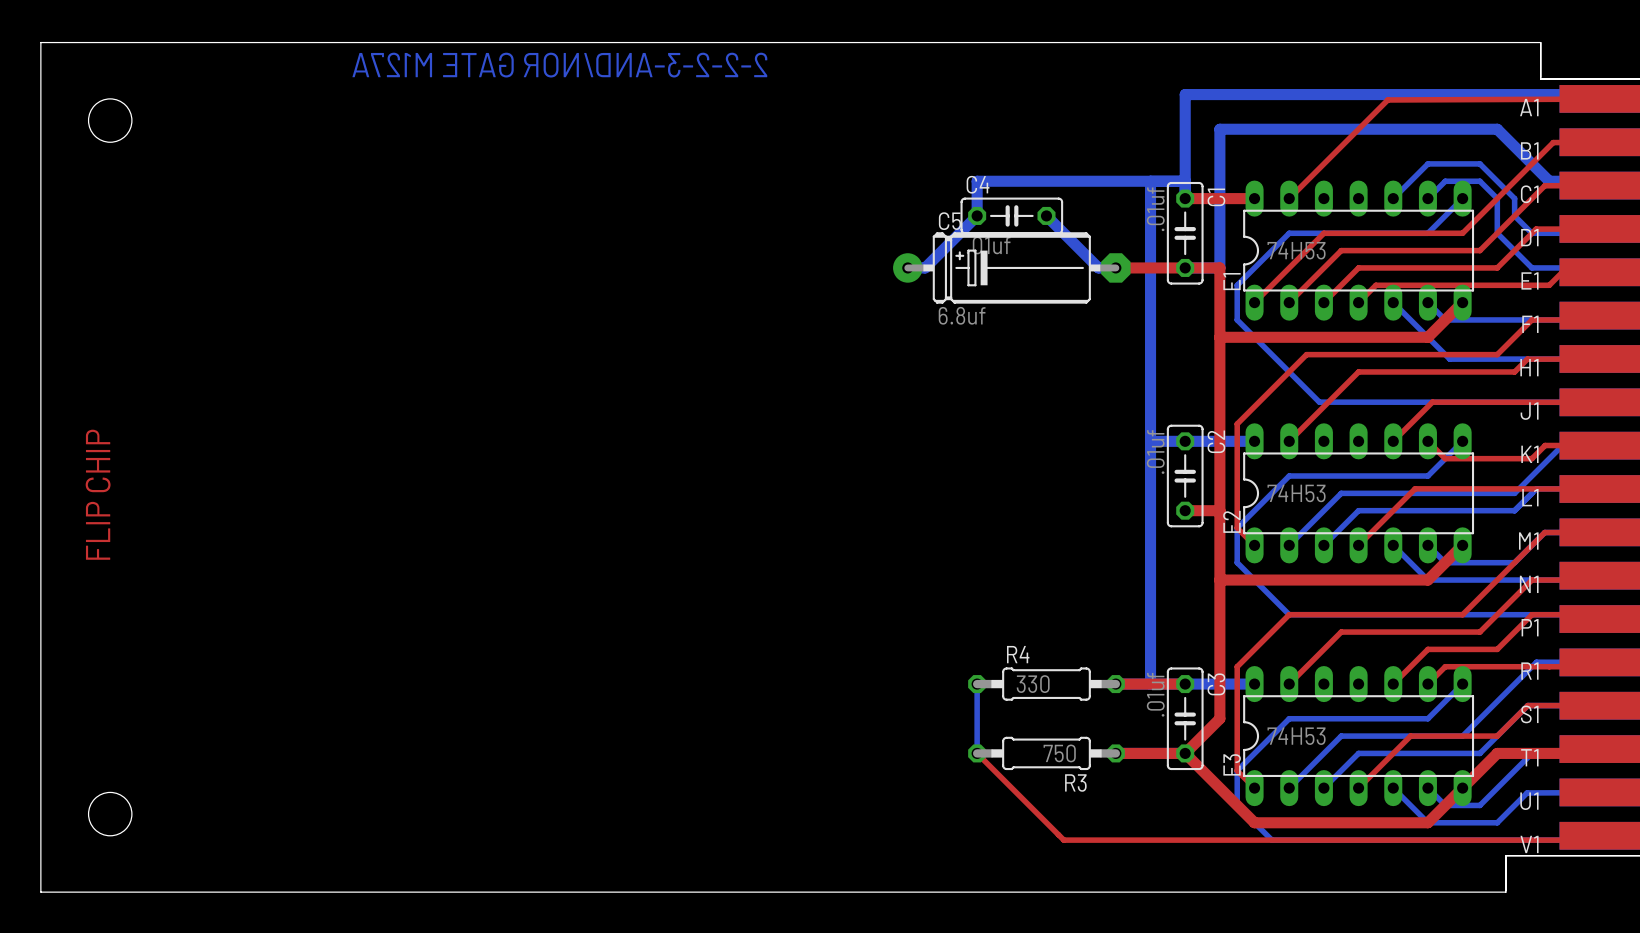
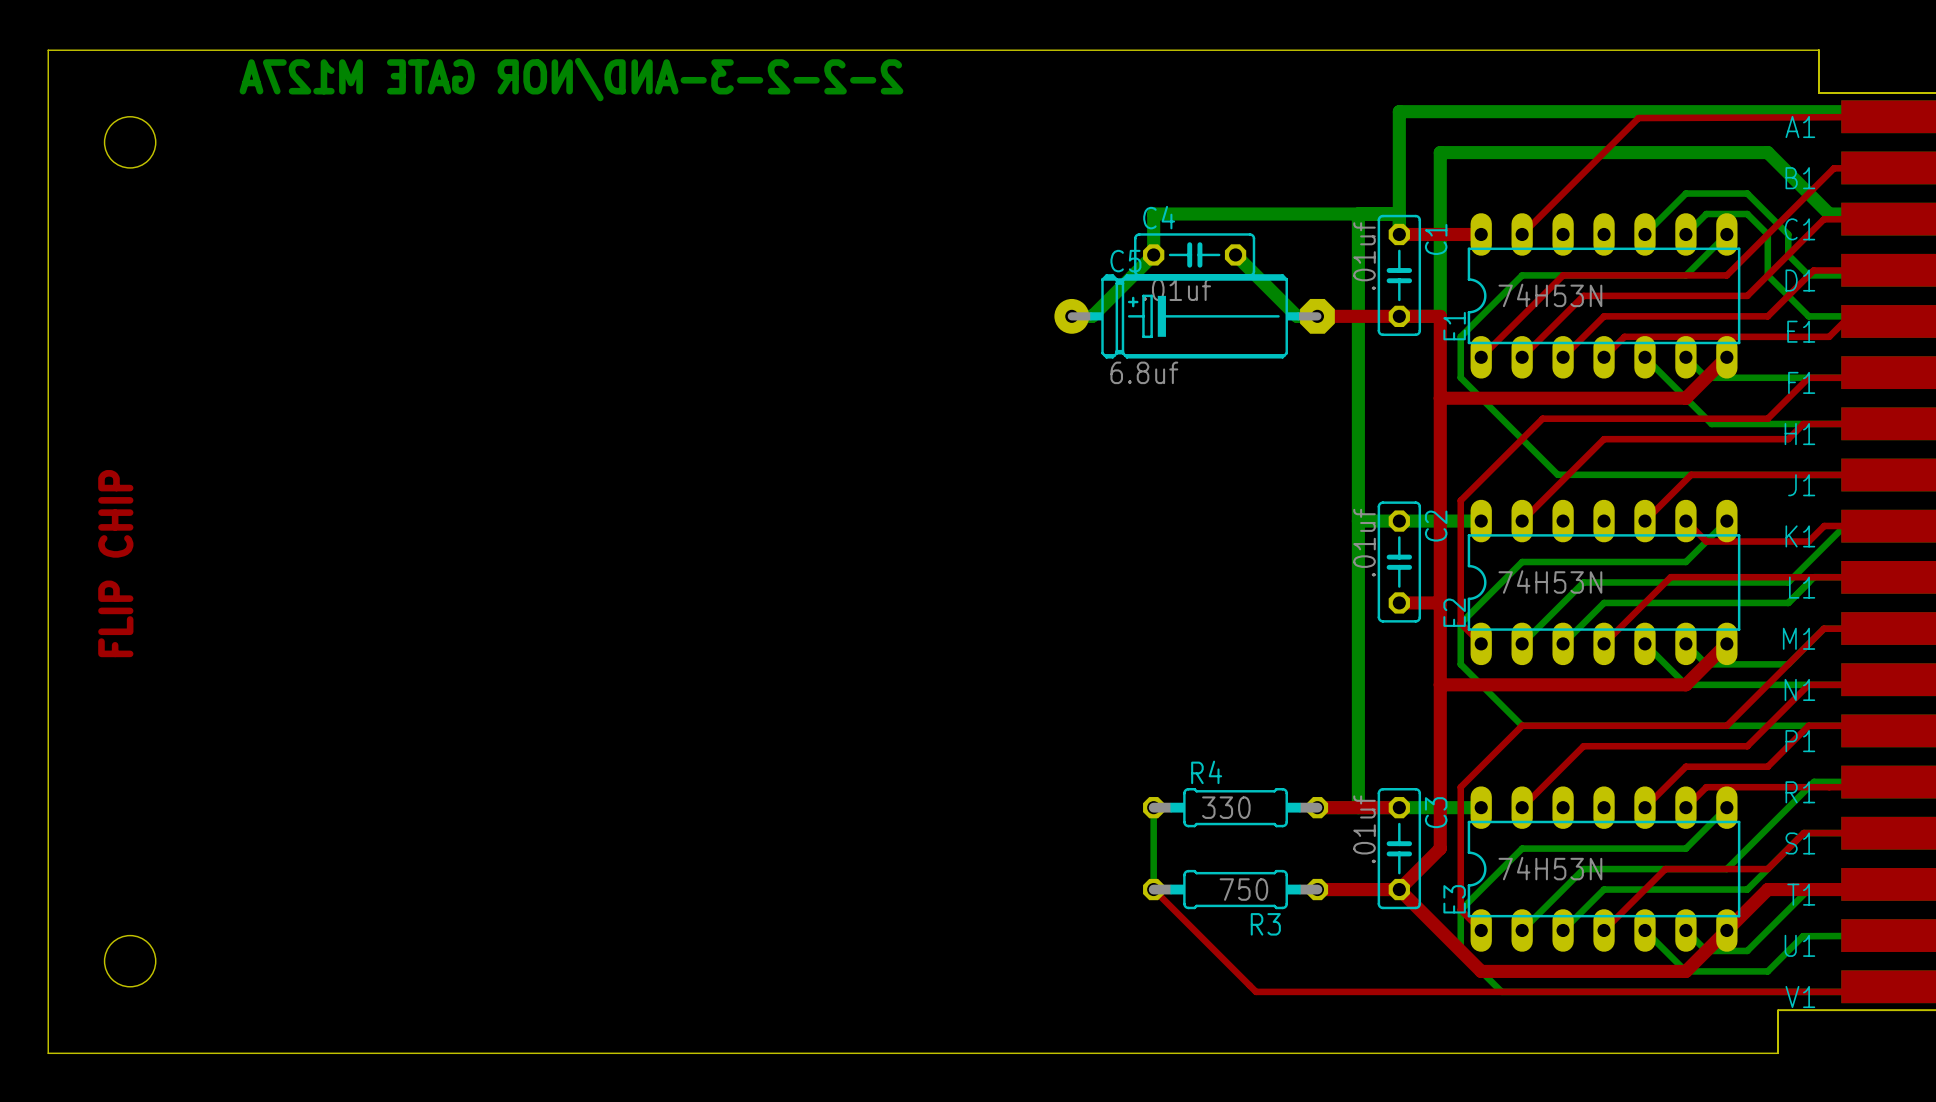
E1 value: 74H53 (1296, 250) -> 74H53N (1550, 295)
E2 value: 74H53 (1296, 493) -> 74H53N (1550, 581)
E3 value: 74H53 (1296, 736) -> 74H53N (1550, 868)

